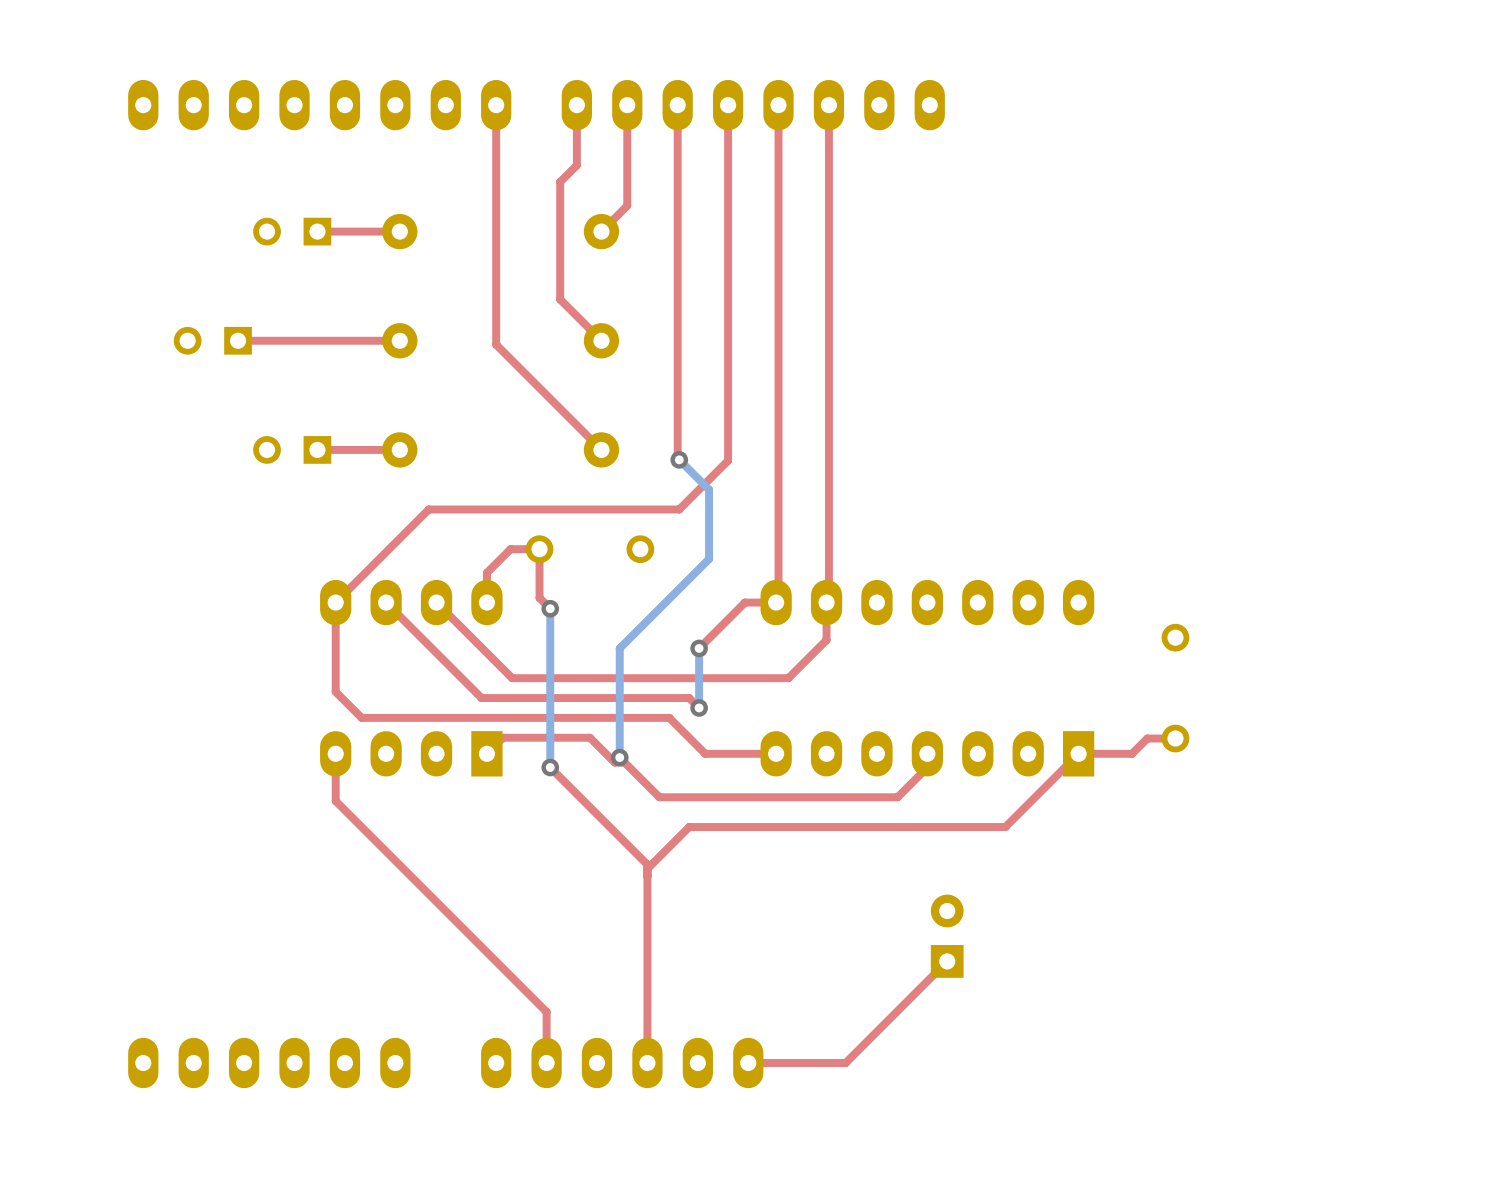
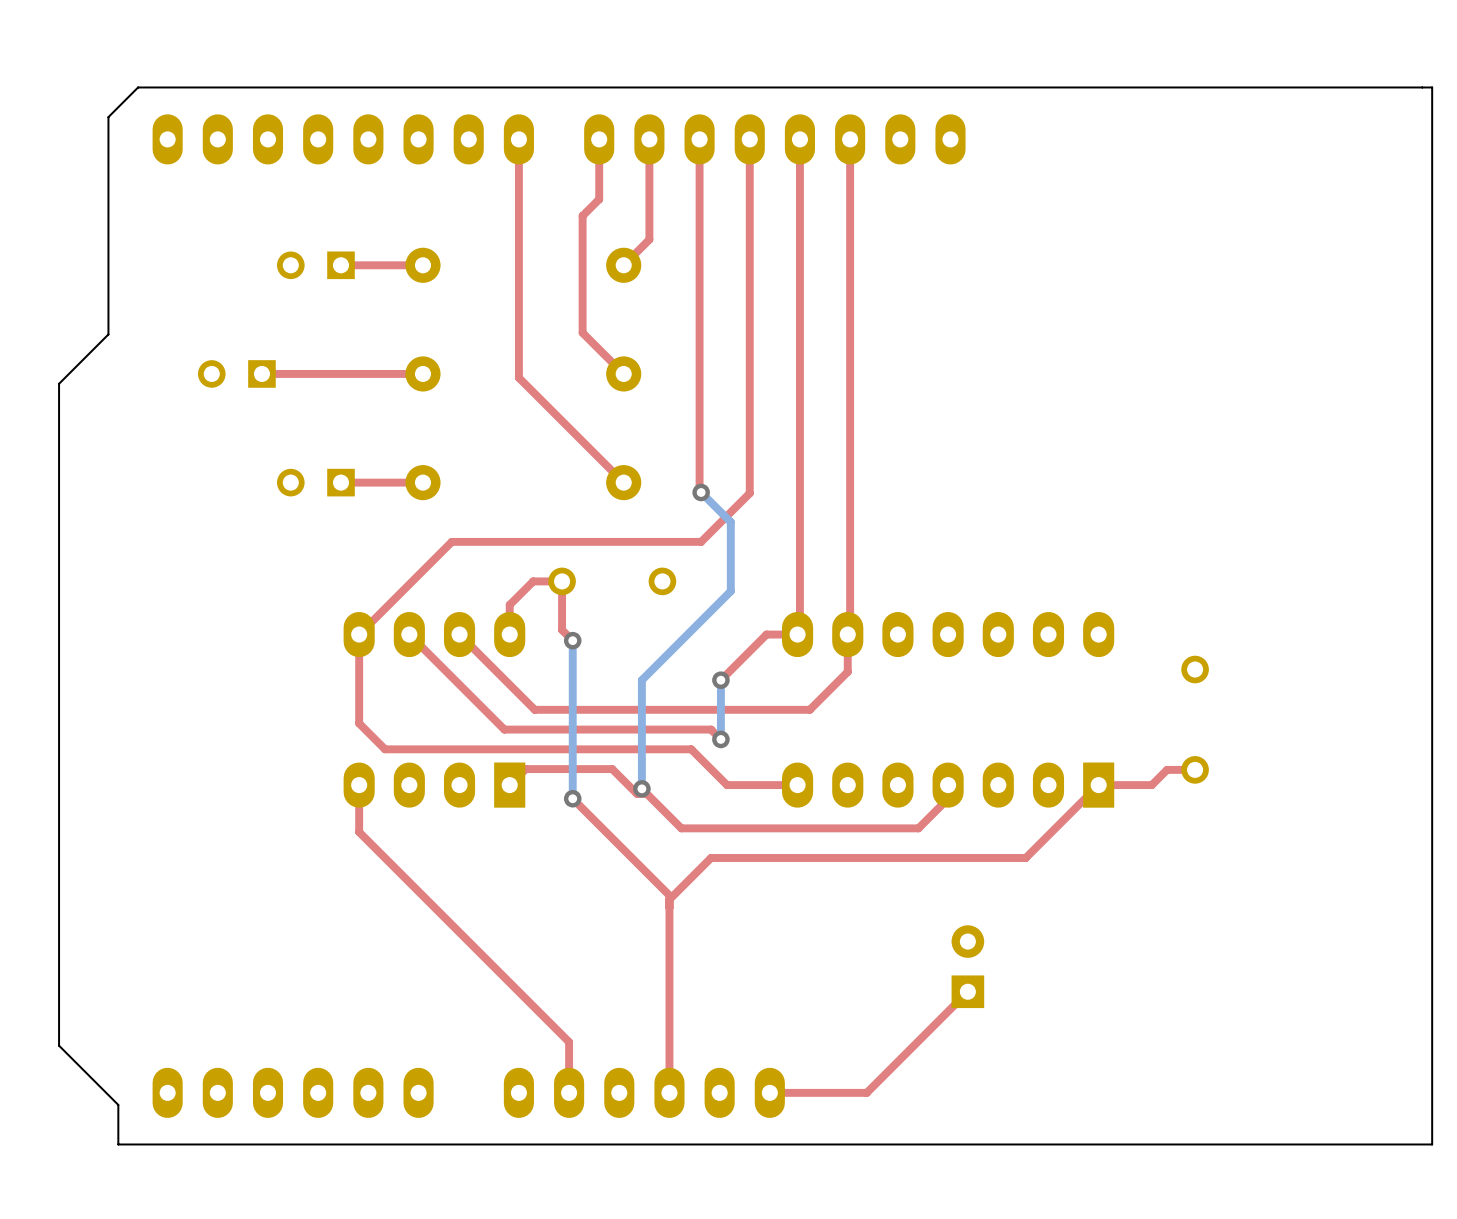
board edge: none -> (1432, 87) (138, 87) (108, 117) (108, 334) (59, 383) (59, 1045) (118, 1104) (118, 1144) (1432, 1144) (1432, 87)

